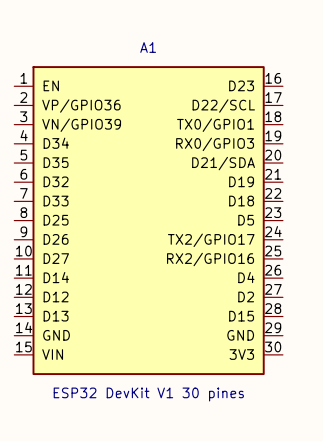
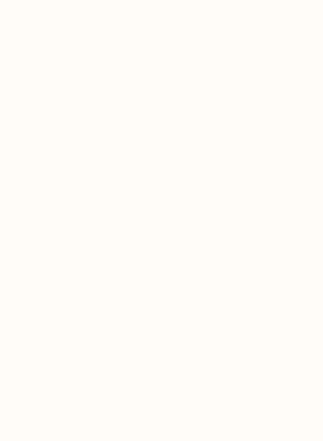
A1: ESP32 DevKit V1 30 pines (148, 220) -> none

